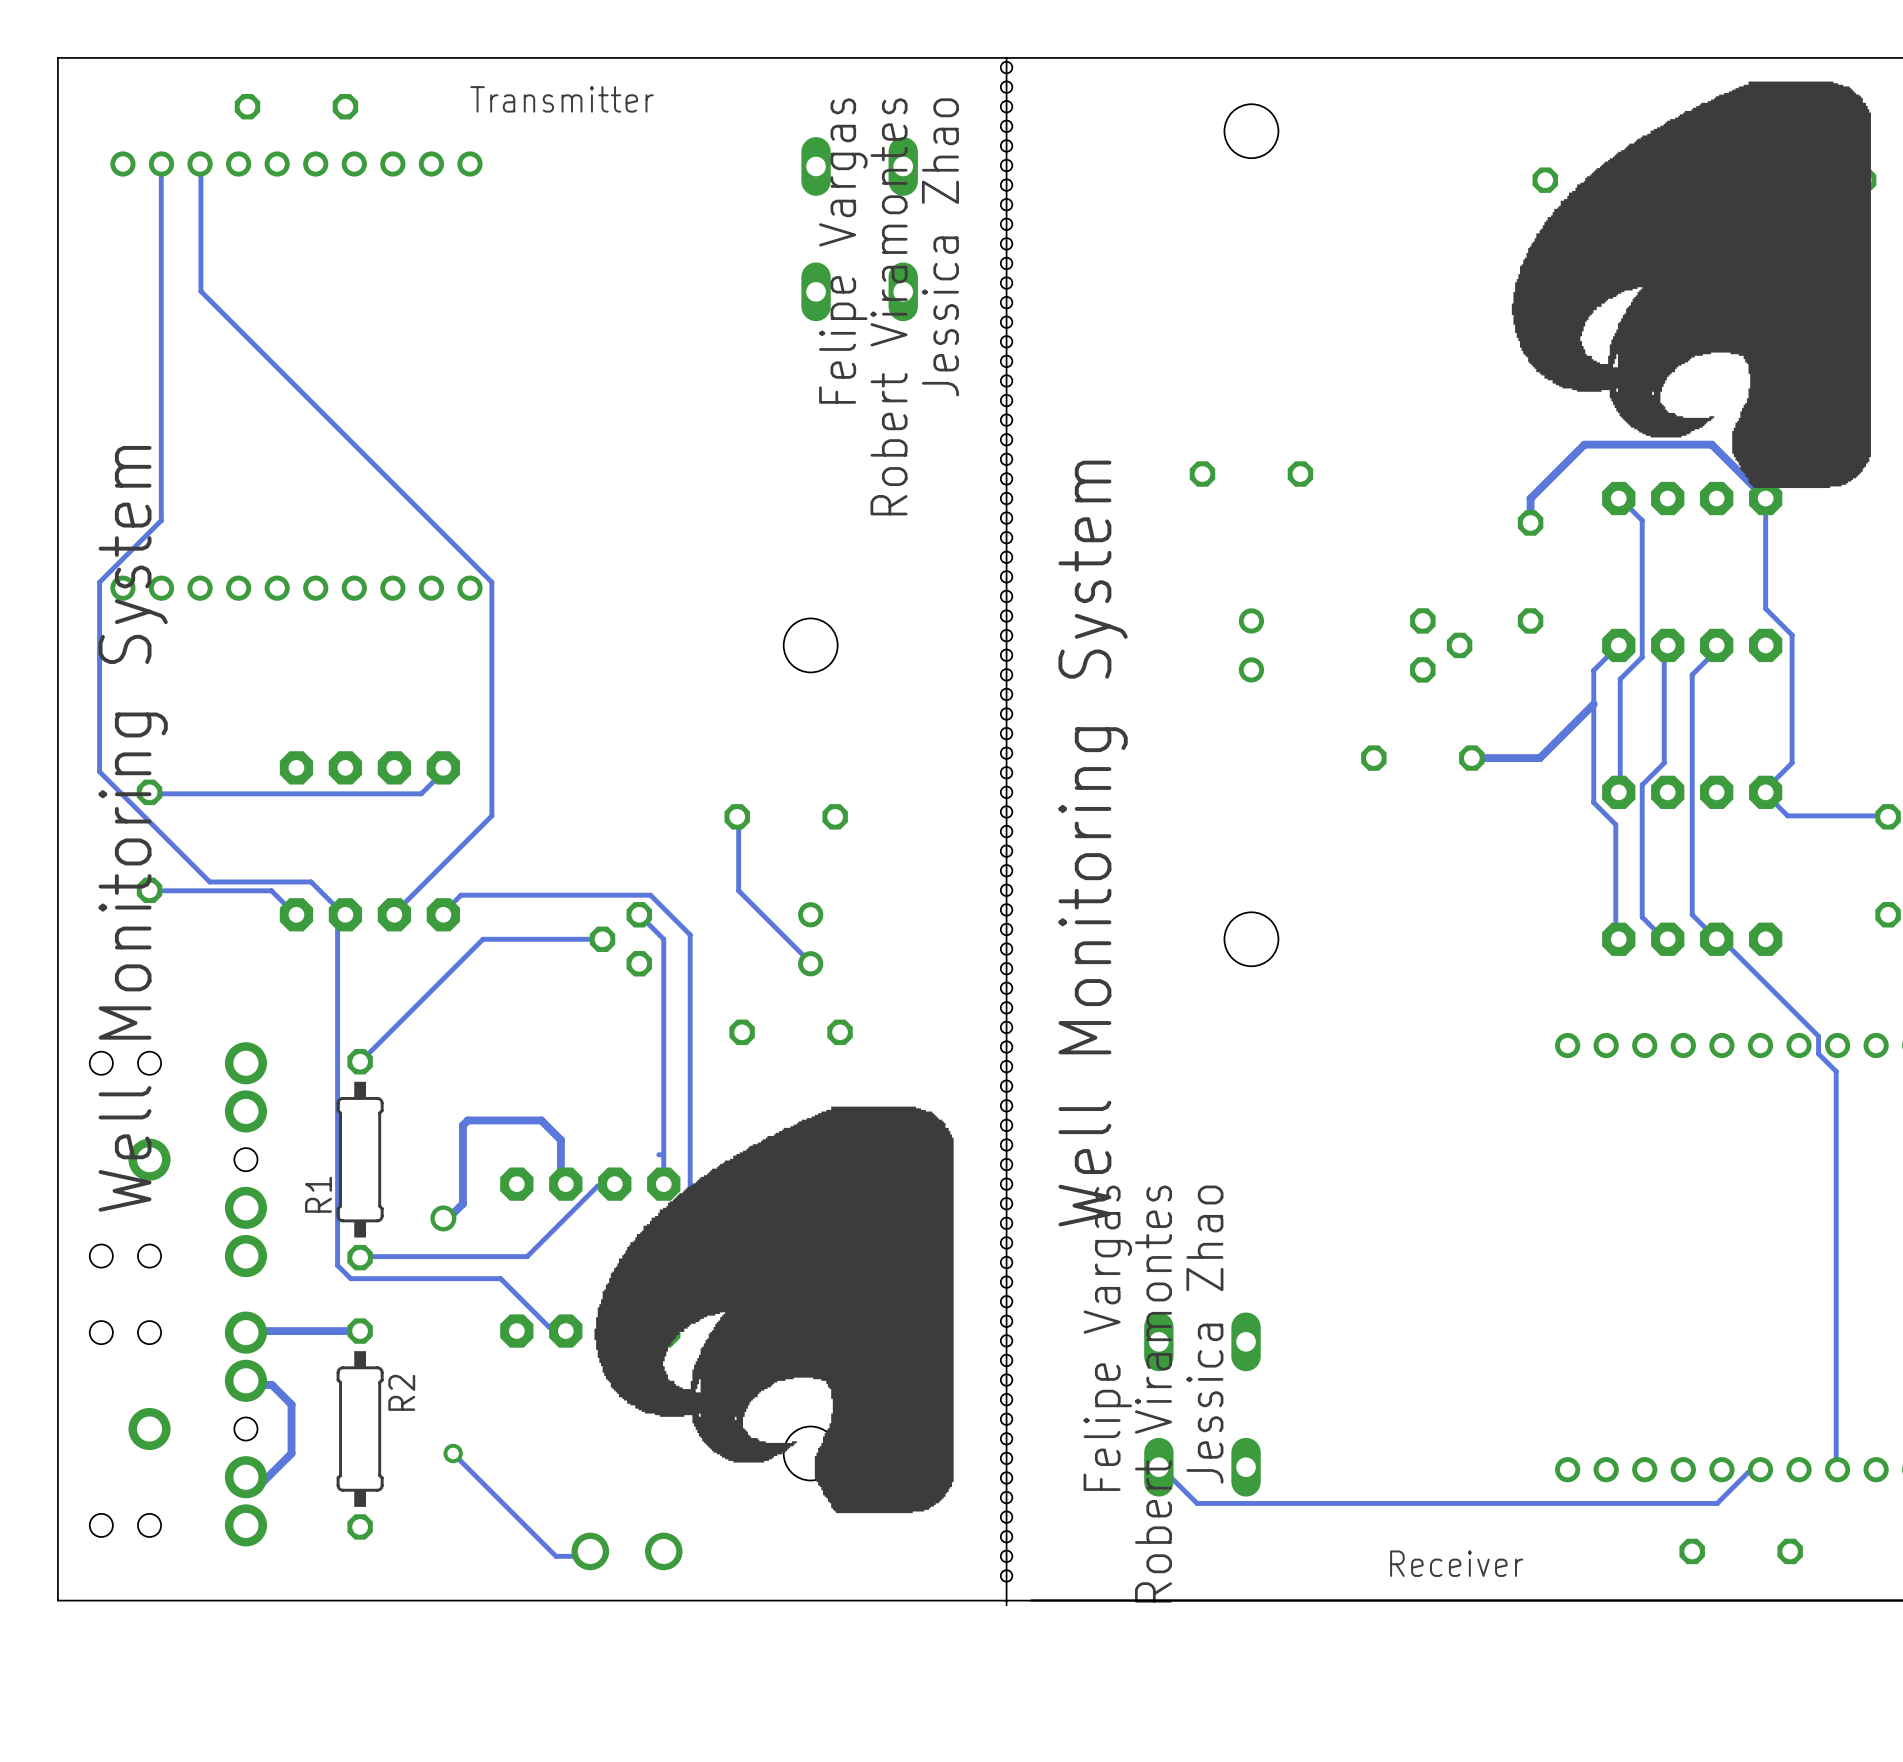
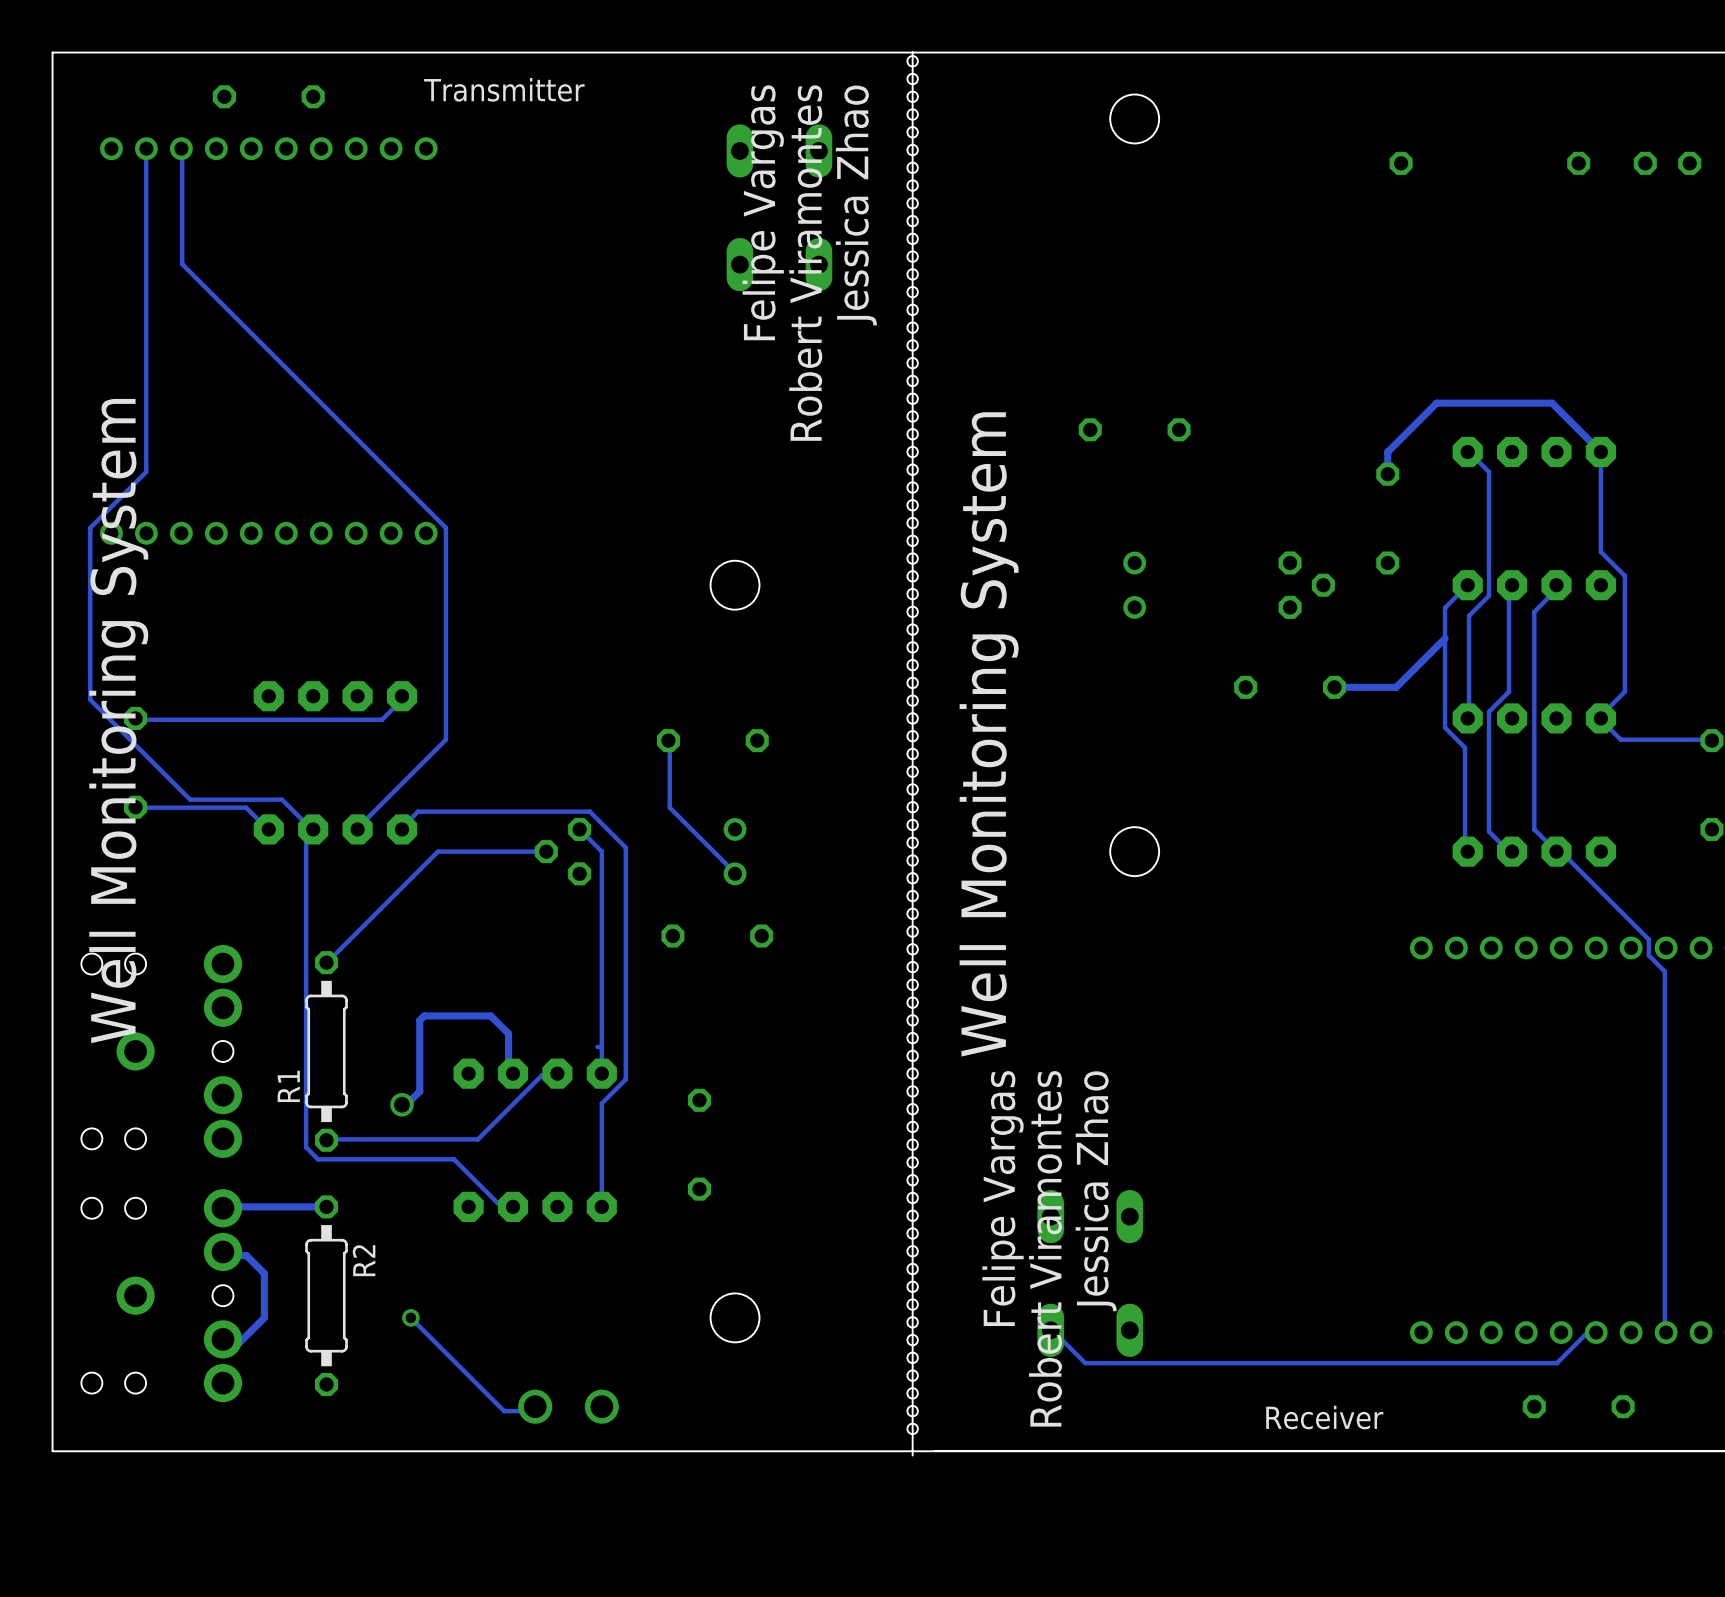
drawing: [1511, 81, 1871, 489] -> none
drawing: [594, 1106, 954, 1514] -> none

